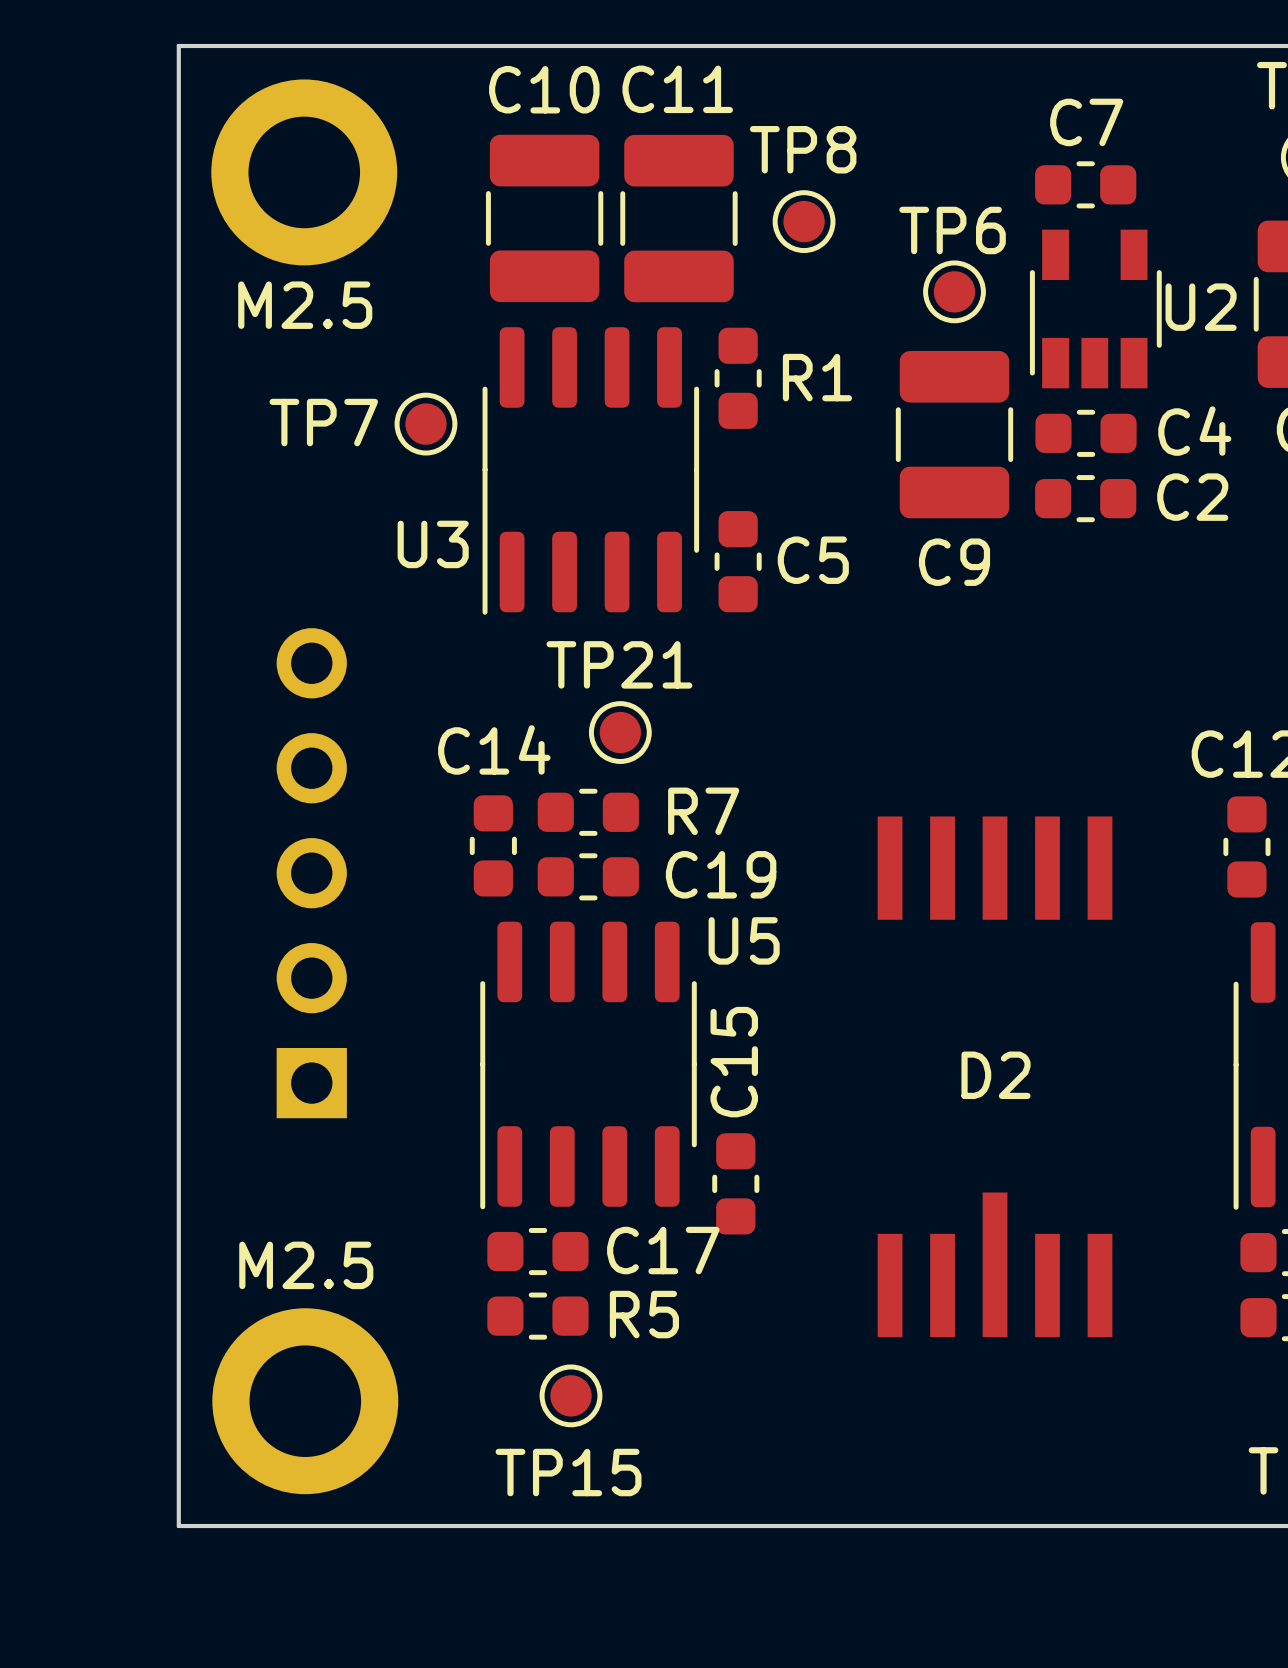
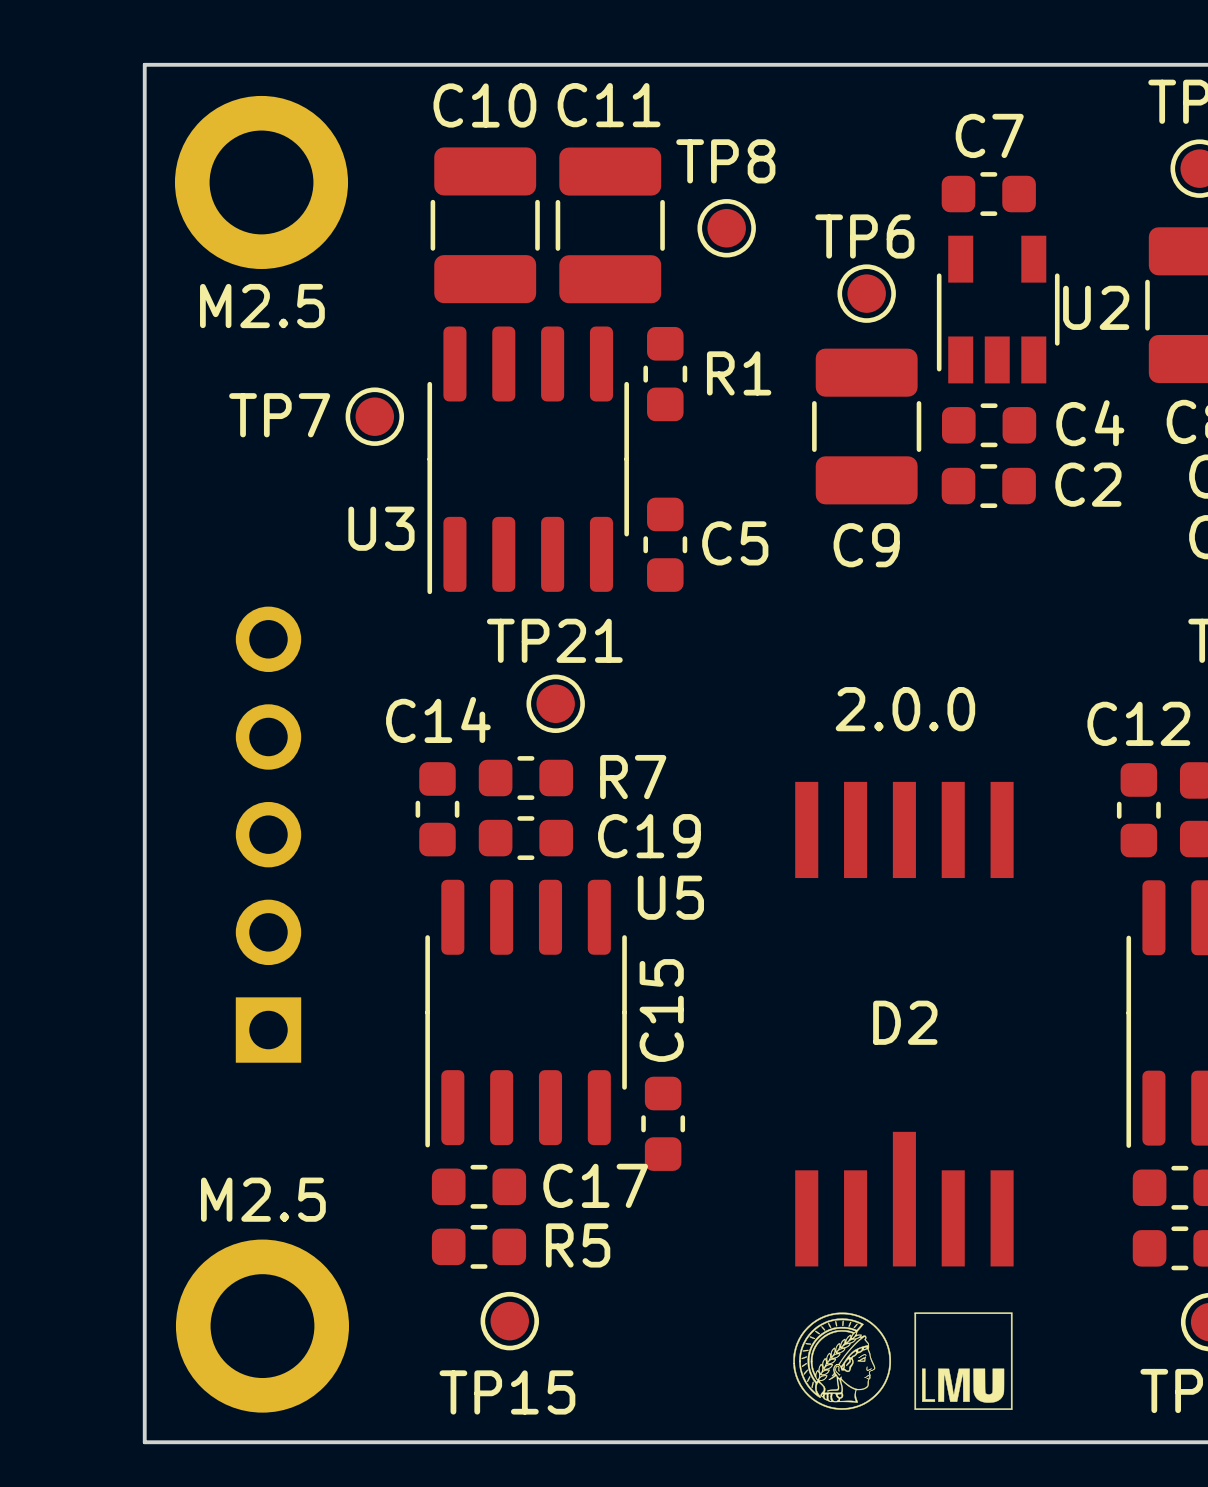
text: none -> 2.0.0 (905, 709)
drawing: none -> [793, 1312, 1013, 1410]

